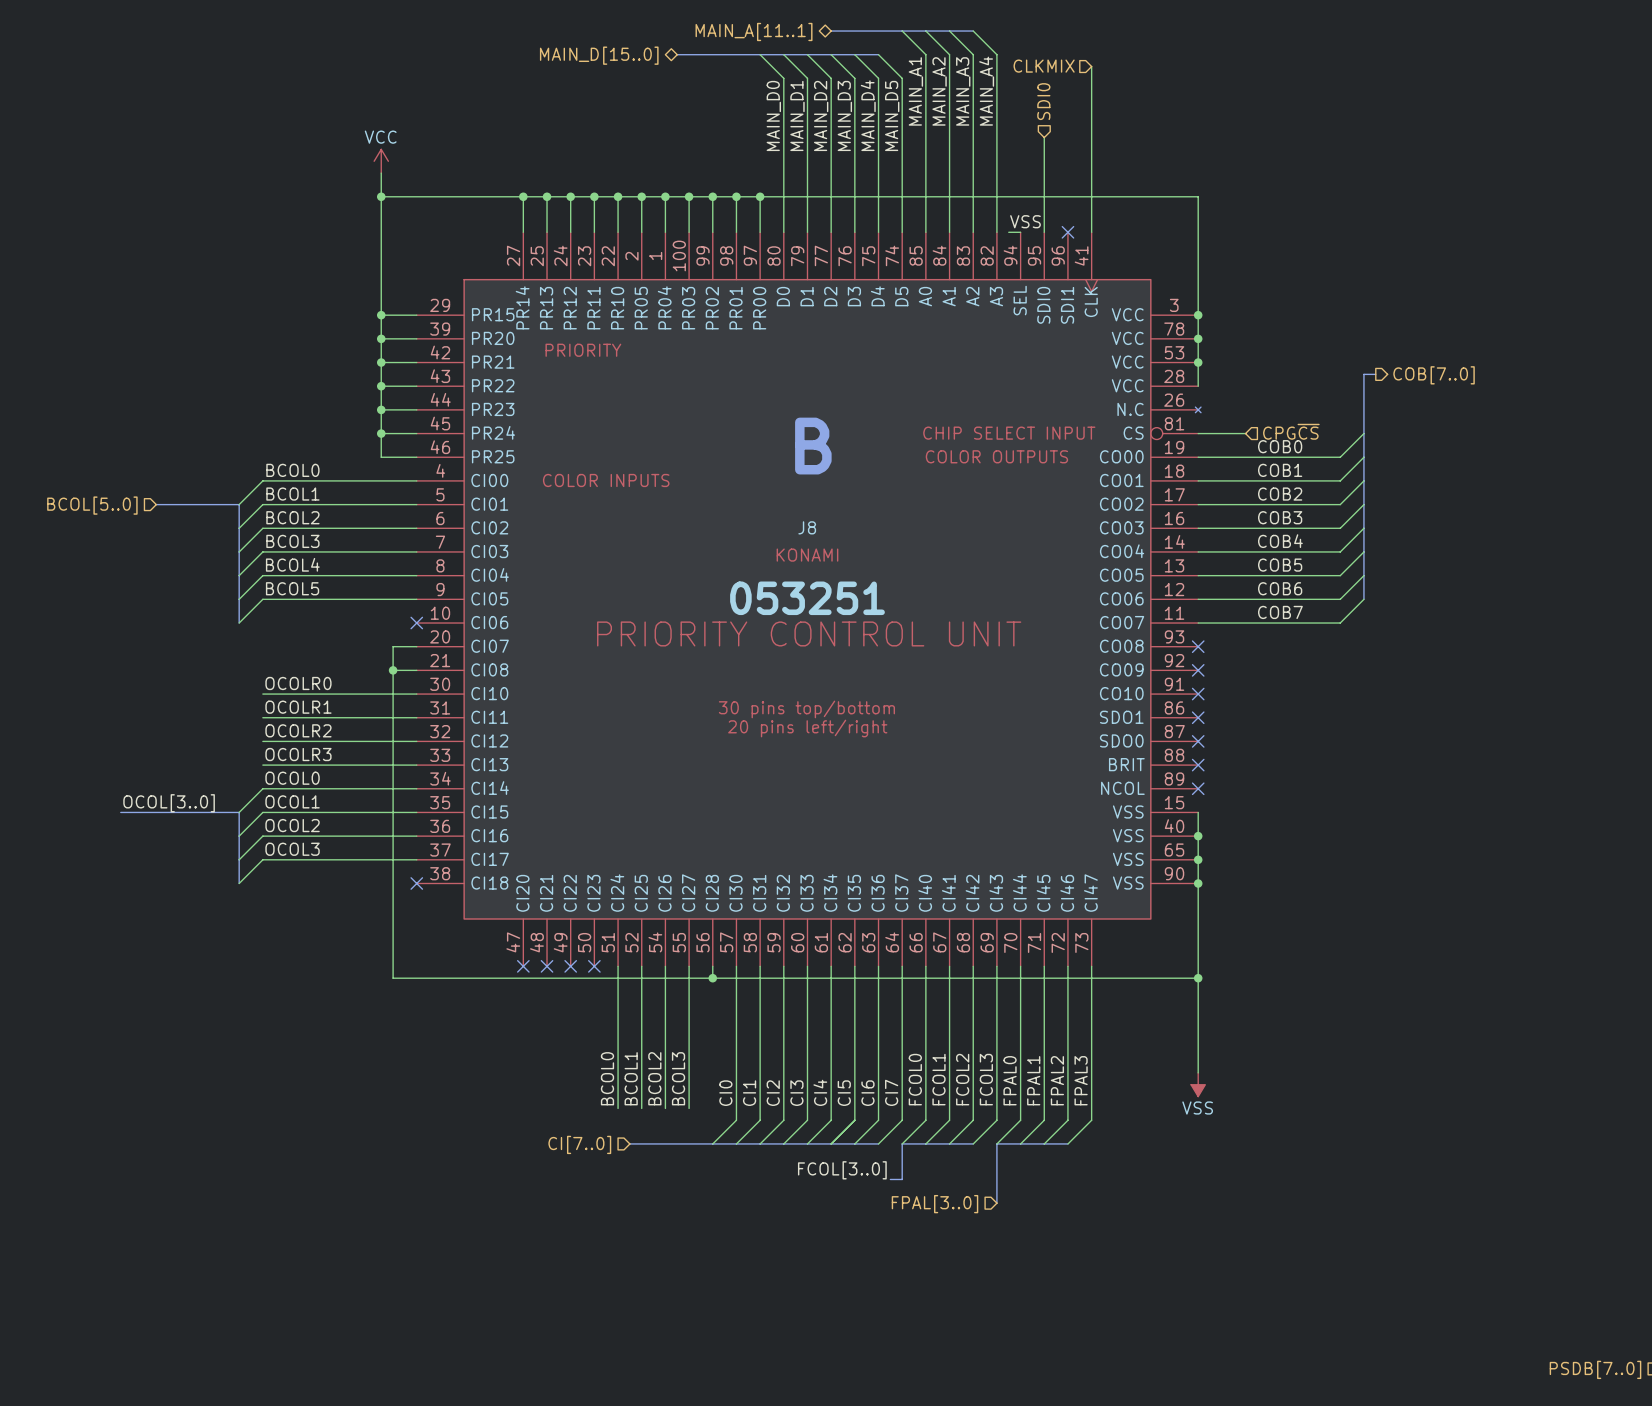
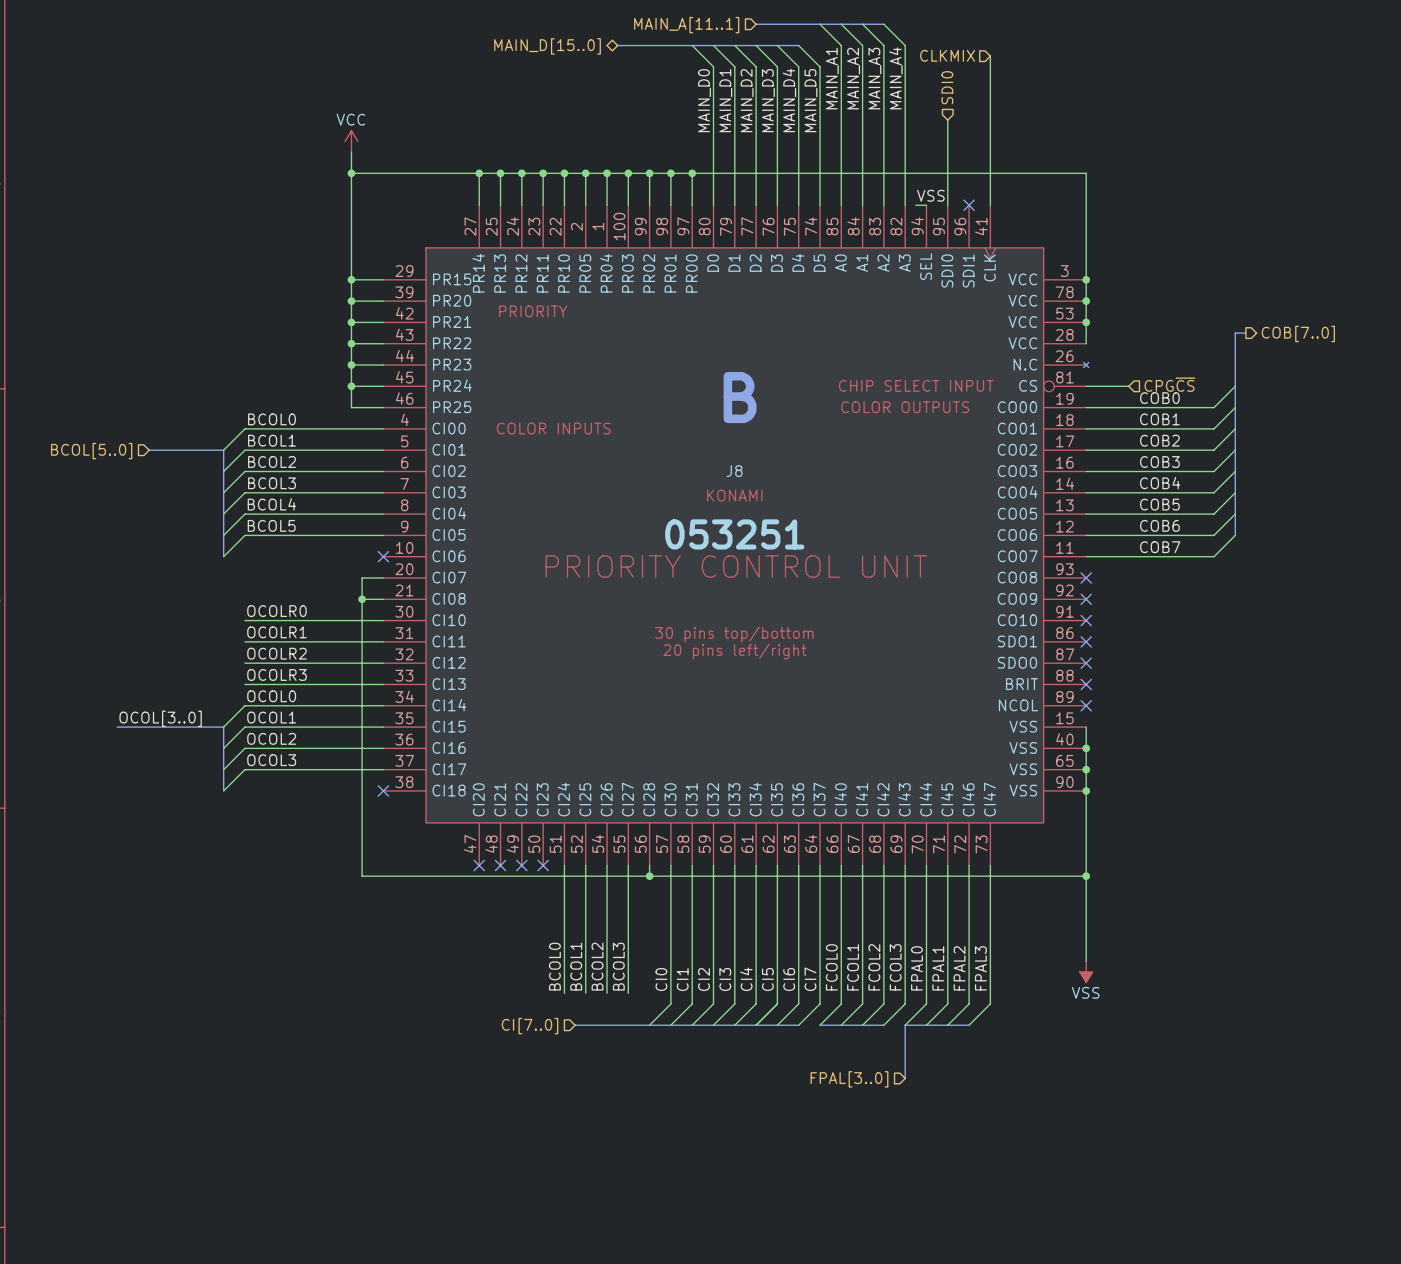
hierarchical label shape: bidirectional (754, 31) -> input (686, 25)
bus: (902, 1143) (902, 1179) (890, 1179) -> none
label: FCOL[3..0] (842, 1170) -> none

